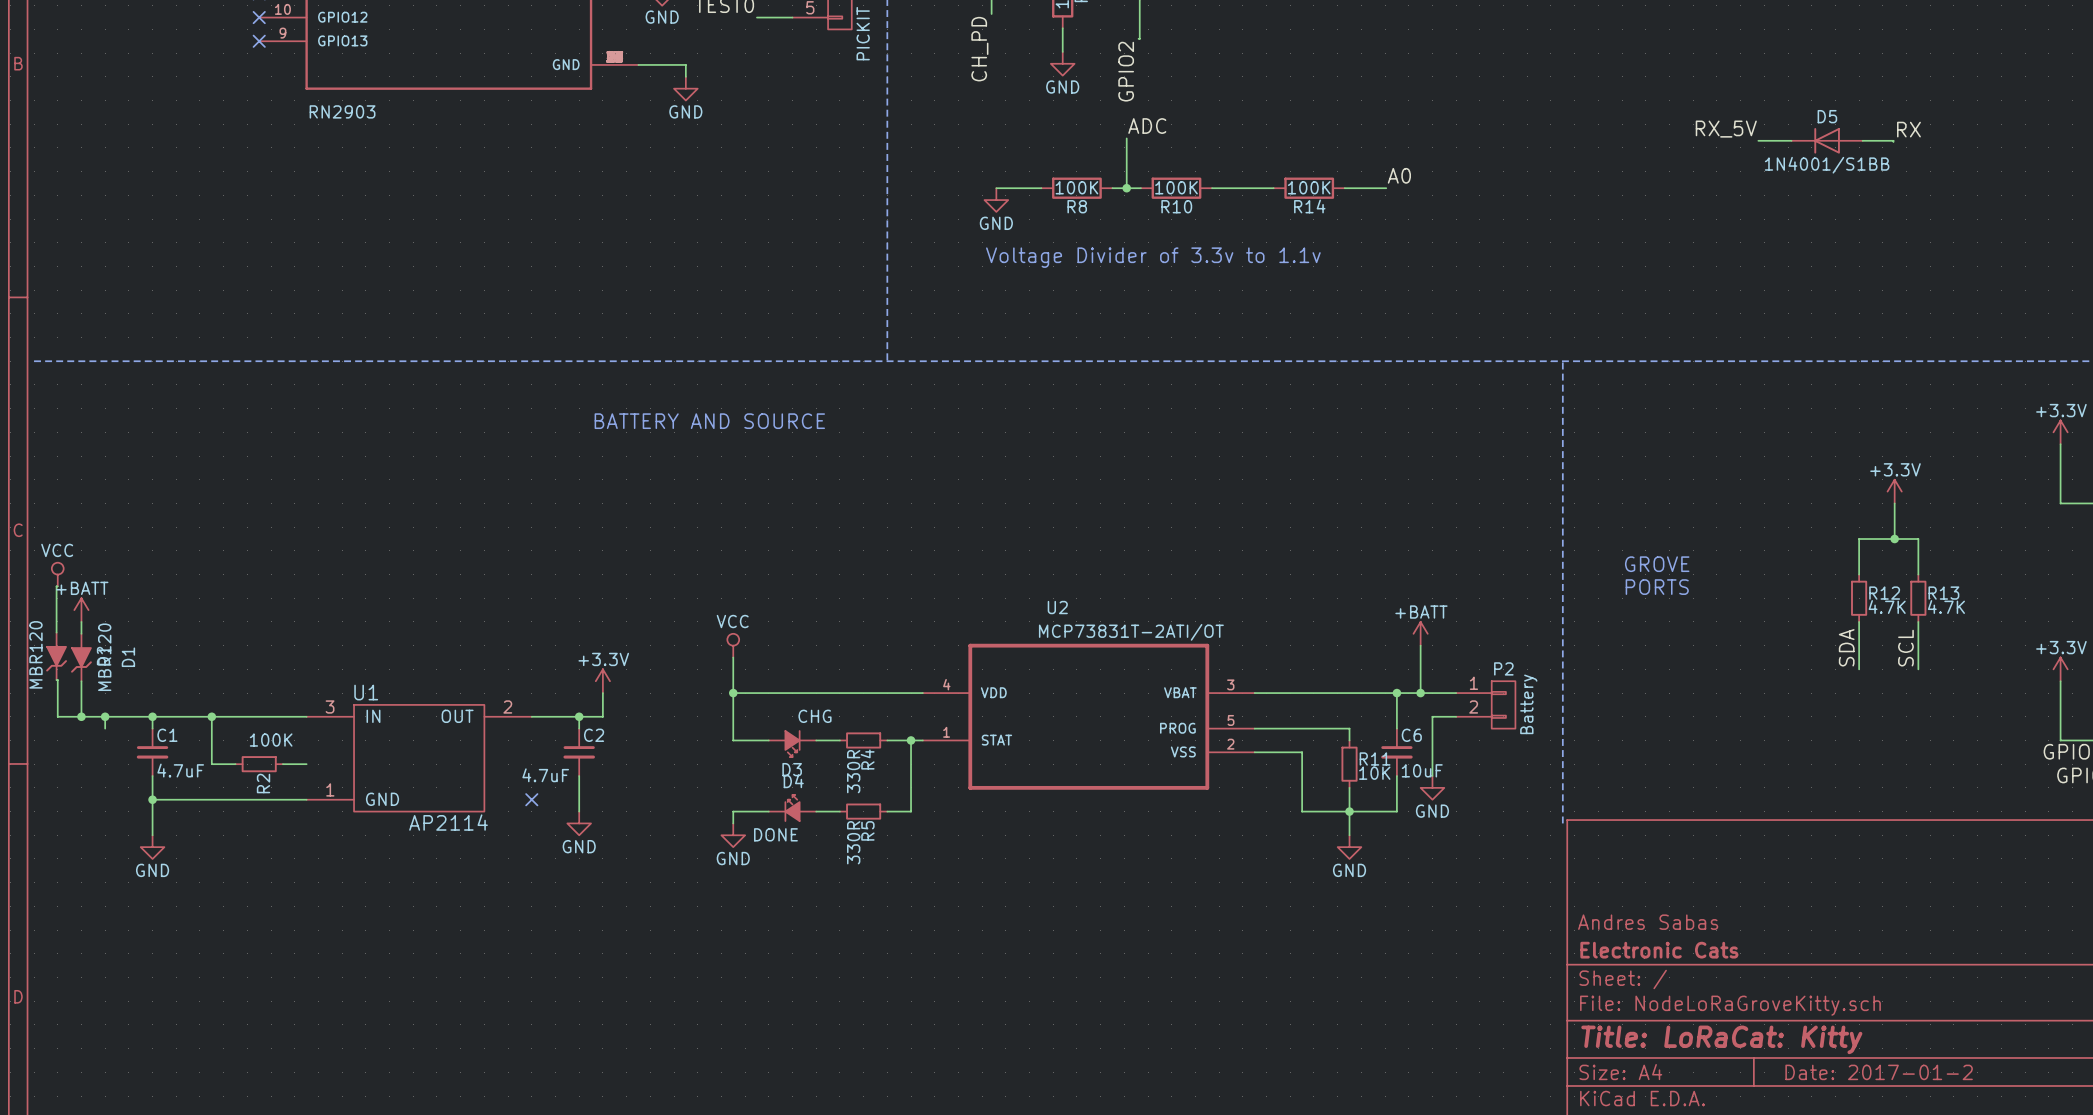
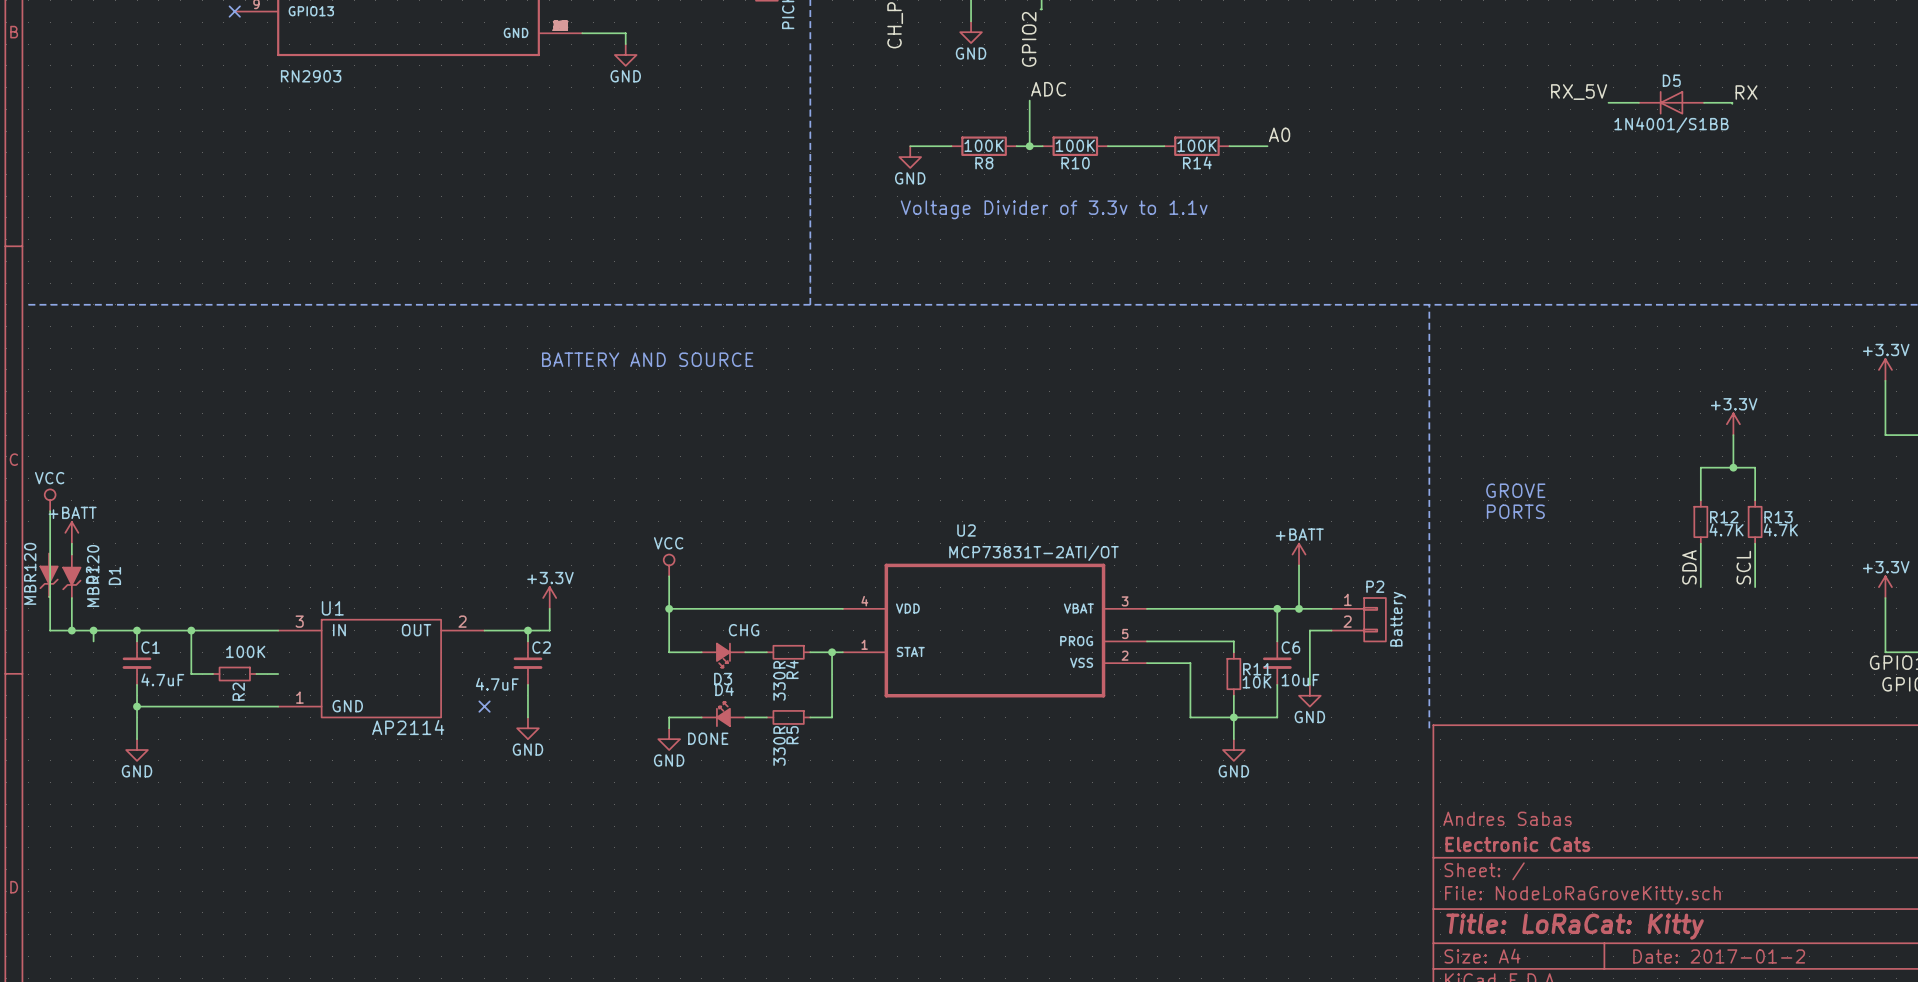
wire: (57, 586) (56, 632) -> (50, 511) (50, 596)

